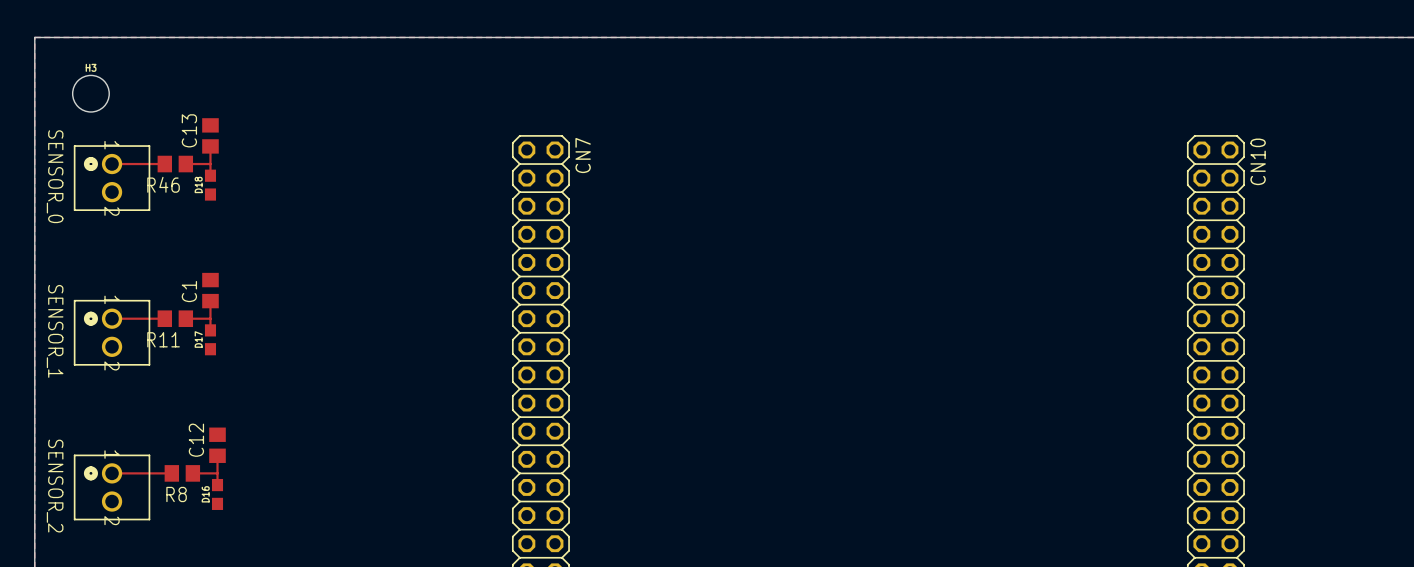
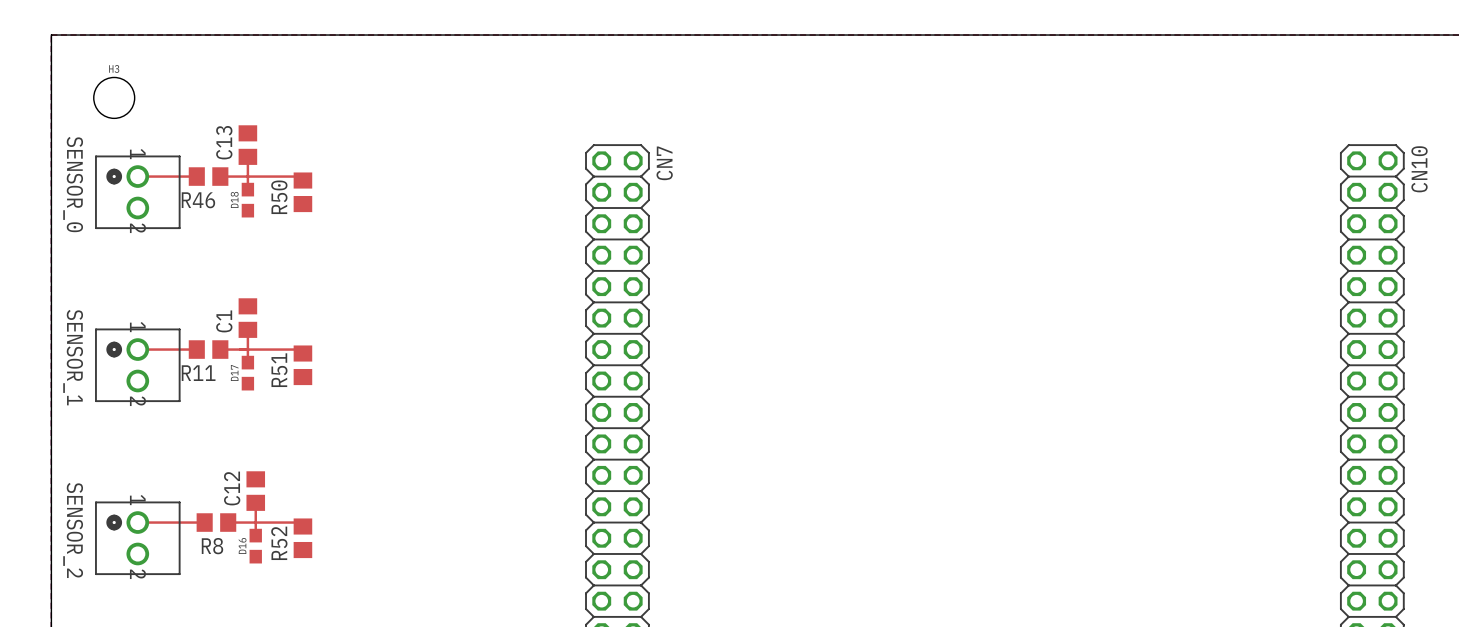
top track: none -> (247, 176) (302, 176)
R50: none -> (302, 192)
top track: none -> (247, 349) (298, 349) (302, 353)
R51: none -> (302, 365)
top track: none -> (255, 522) (302, 522)
R52: none -> (302, 538)

